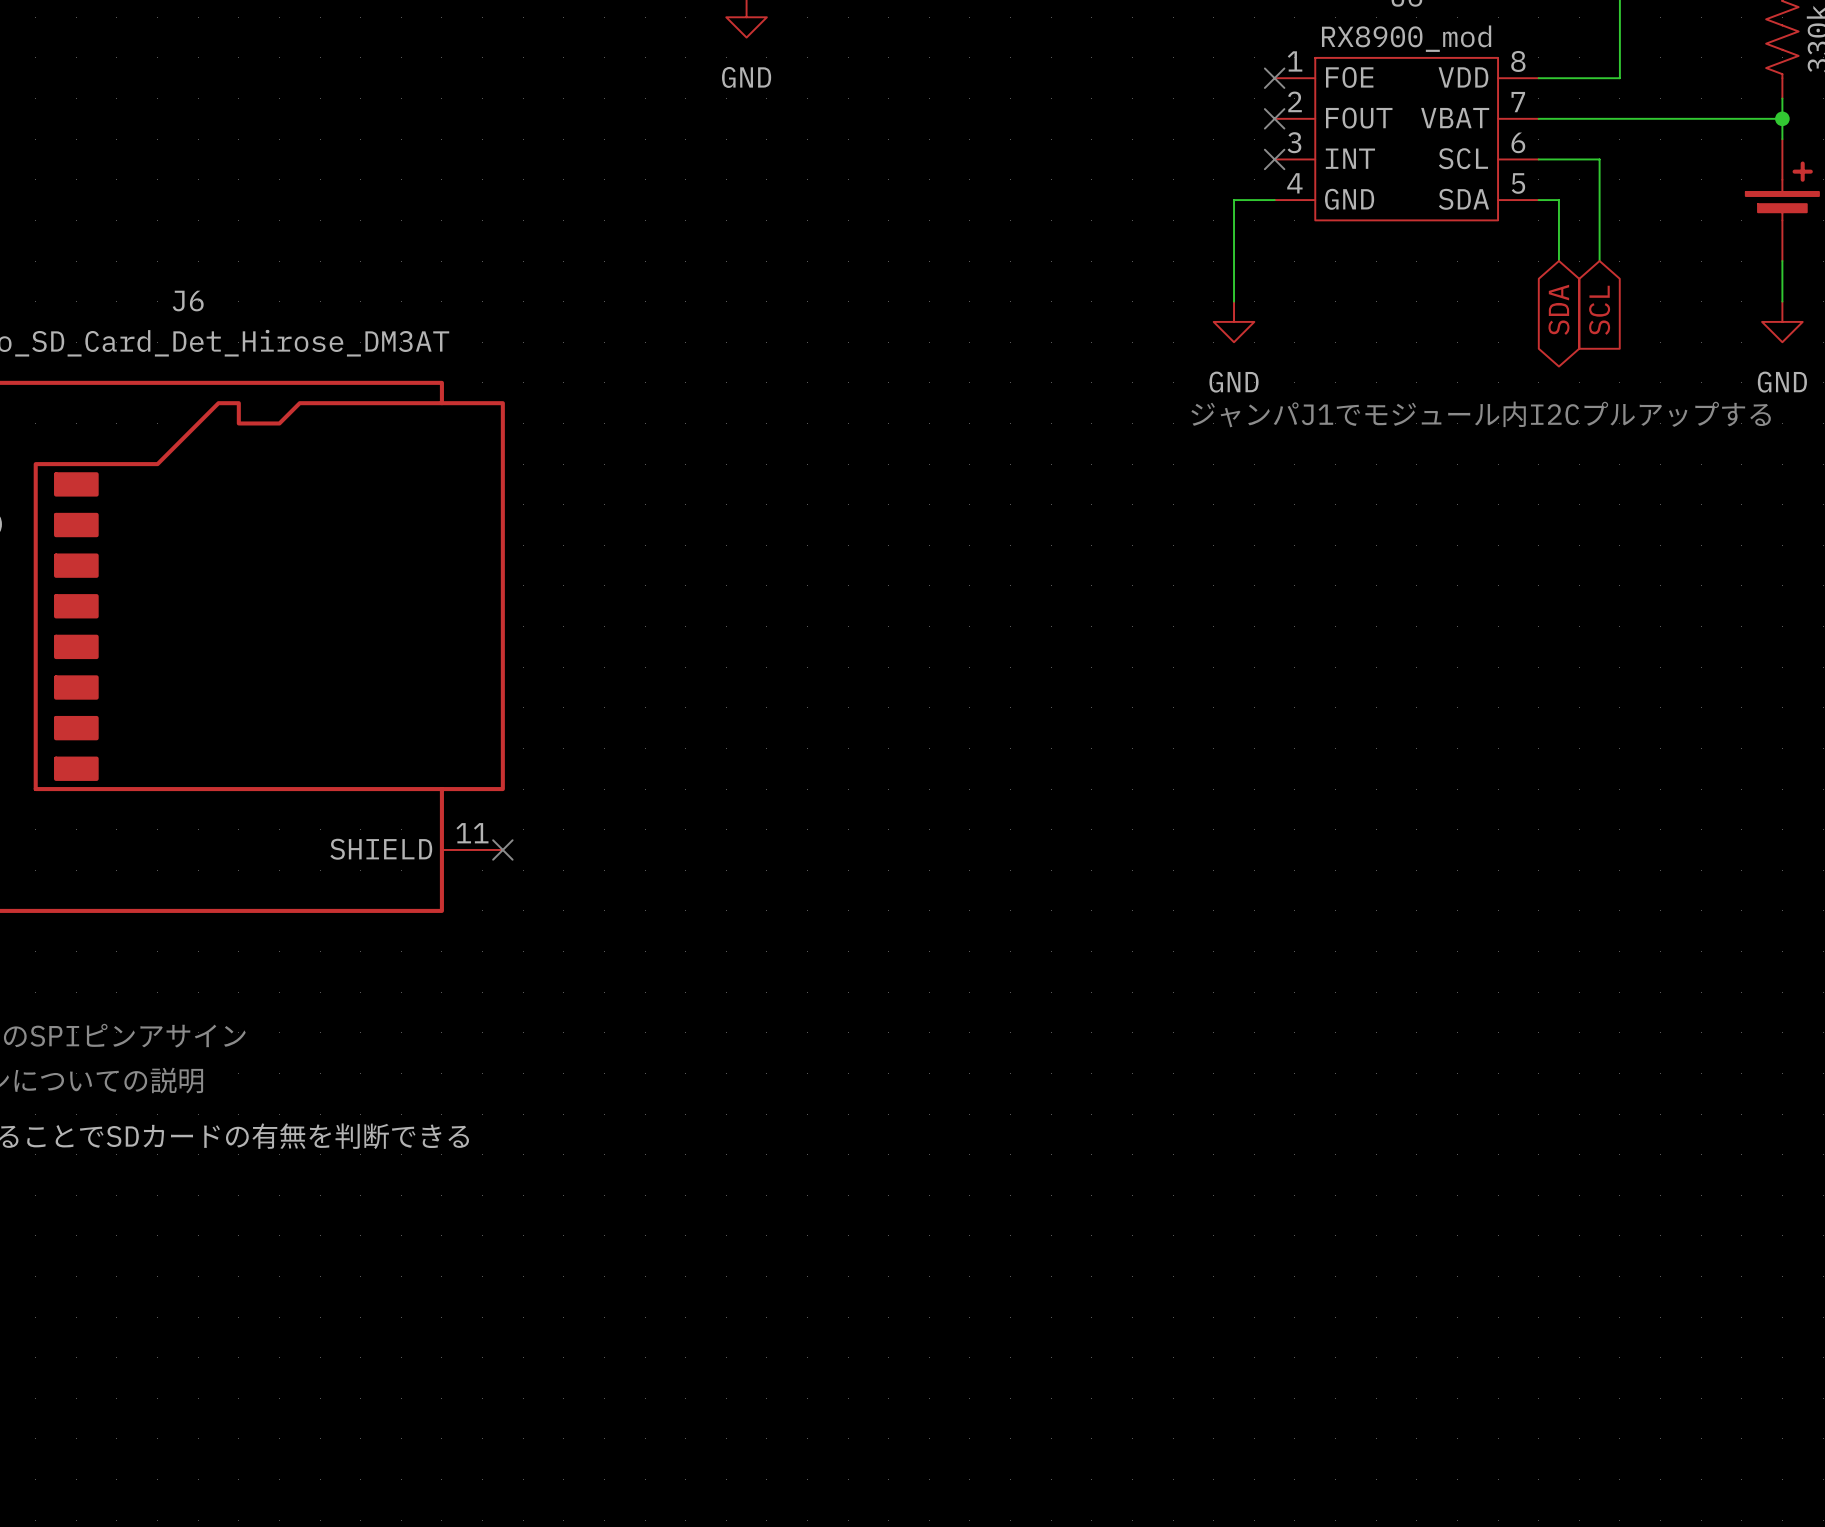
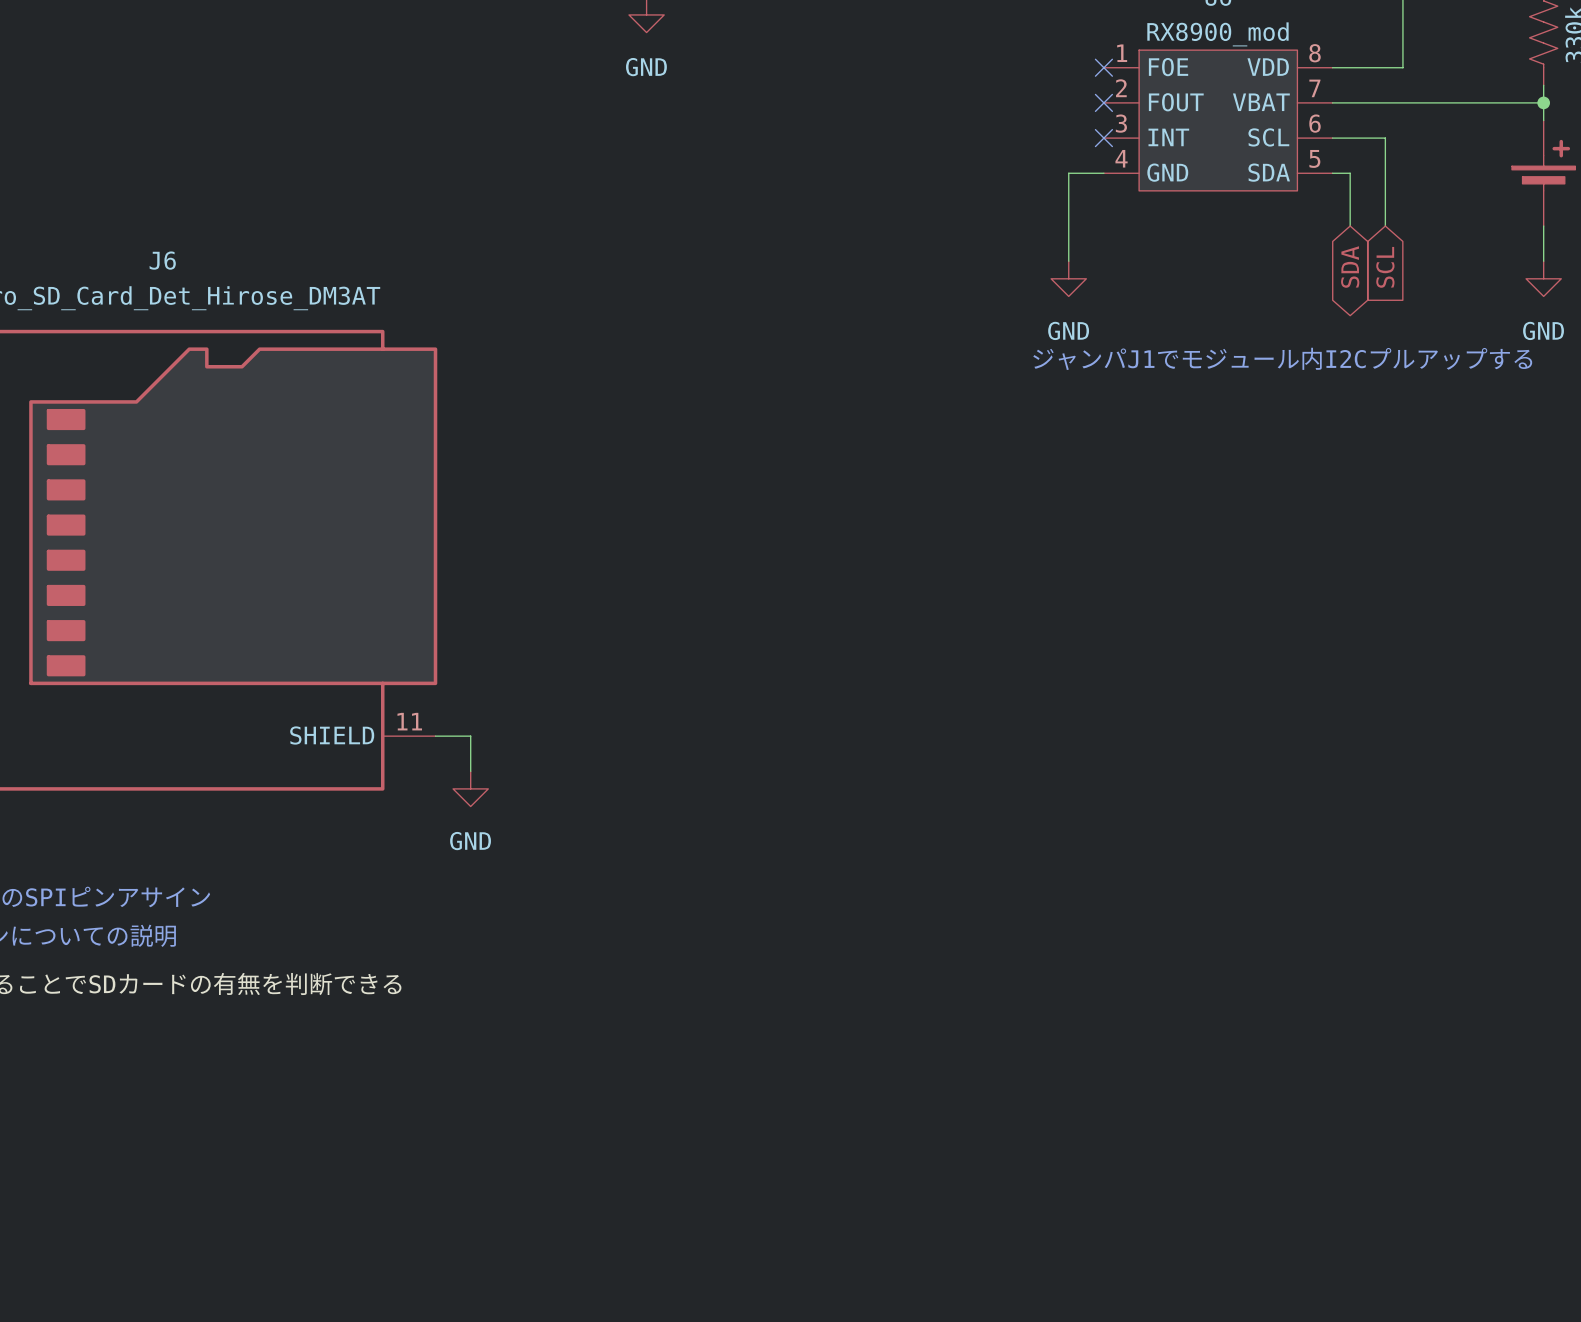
wire: none -> (435, 736) (470, 736) (470, 771)
no-connect mark: (502, 849) -> none
power symbol: none -> GND (470, 788)

